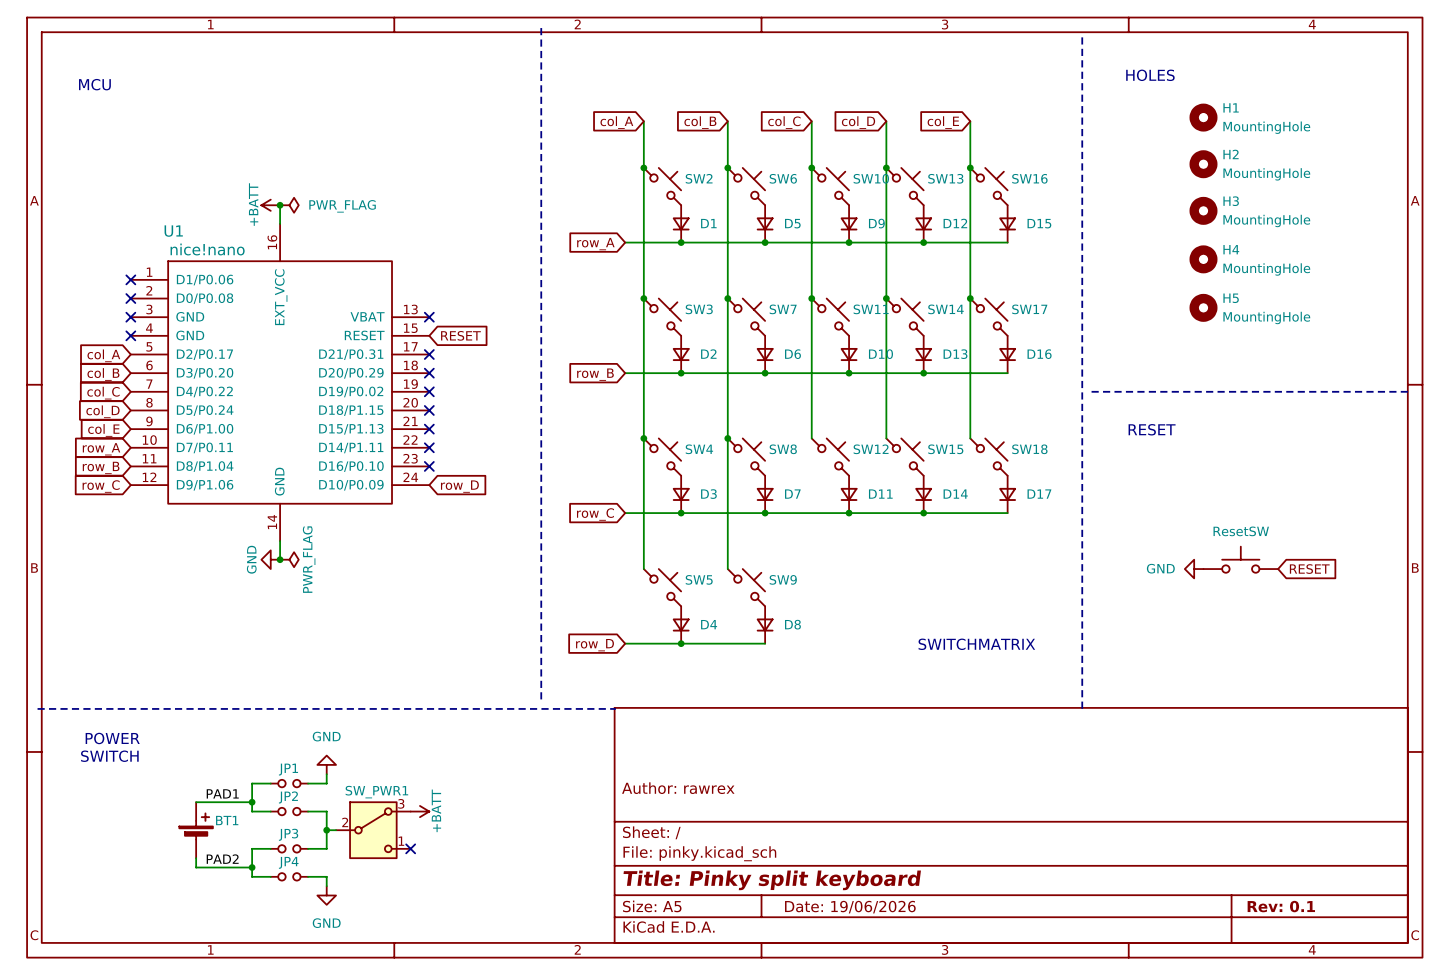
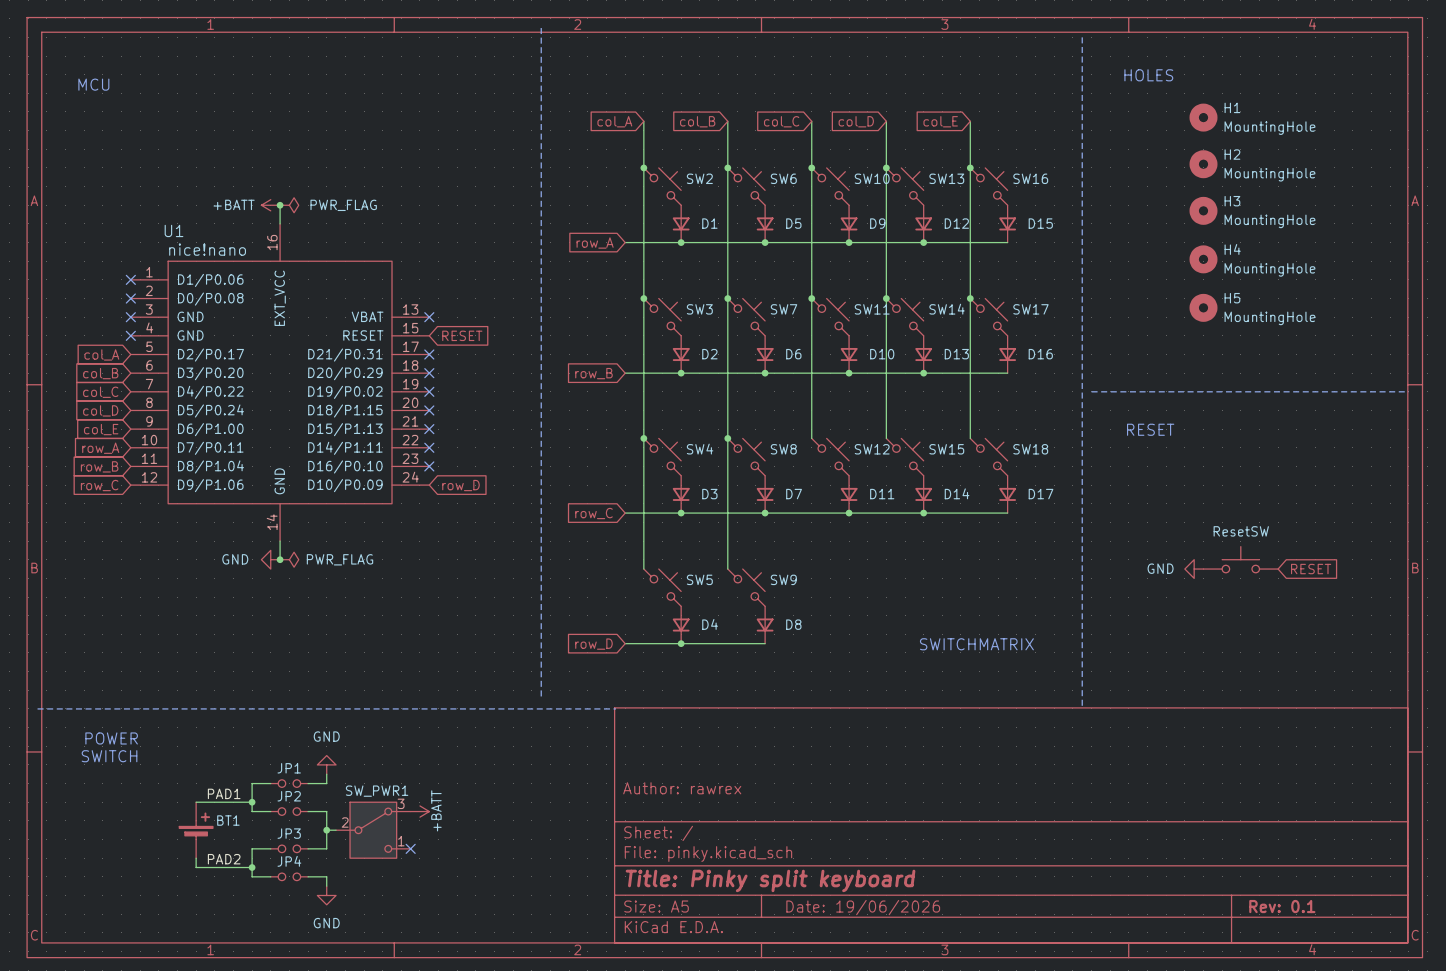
power symbol text rotation: 0° (253, 204) -> 90° clockwise (234, 204)
power symbol text rotation: 0° (251, 559) -> 90° clockwise (235, 559)
power symbol text rotation: 0° (309, 559) -> 90° clockwise (339, 559)

